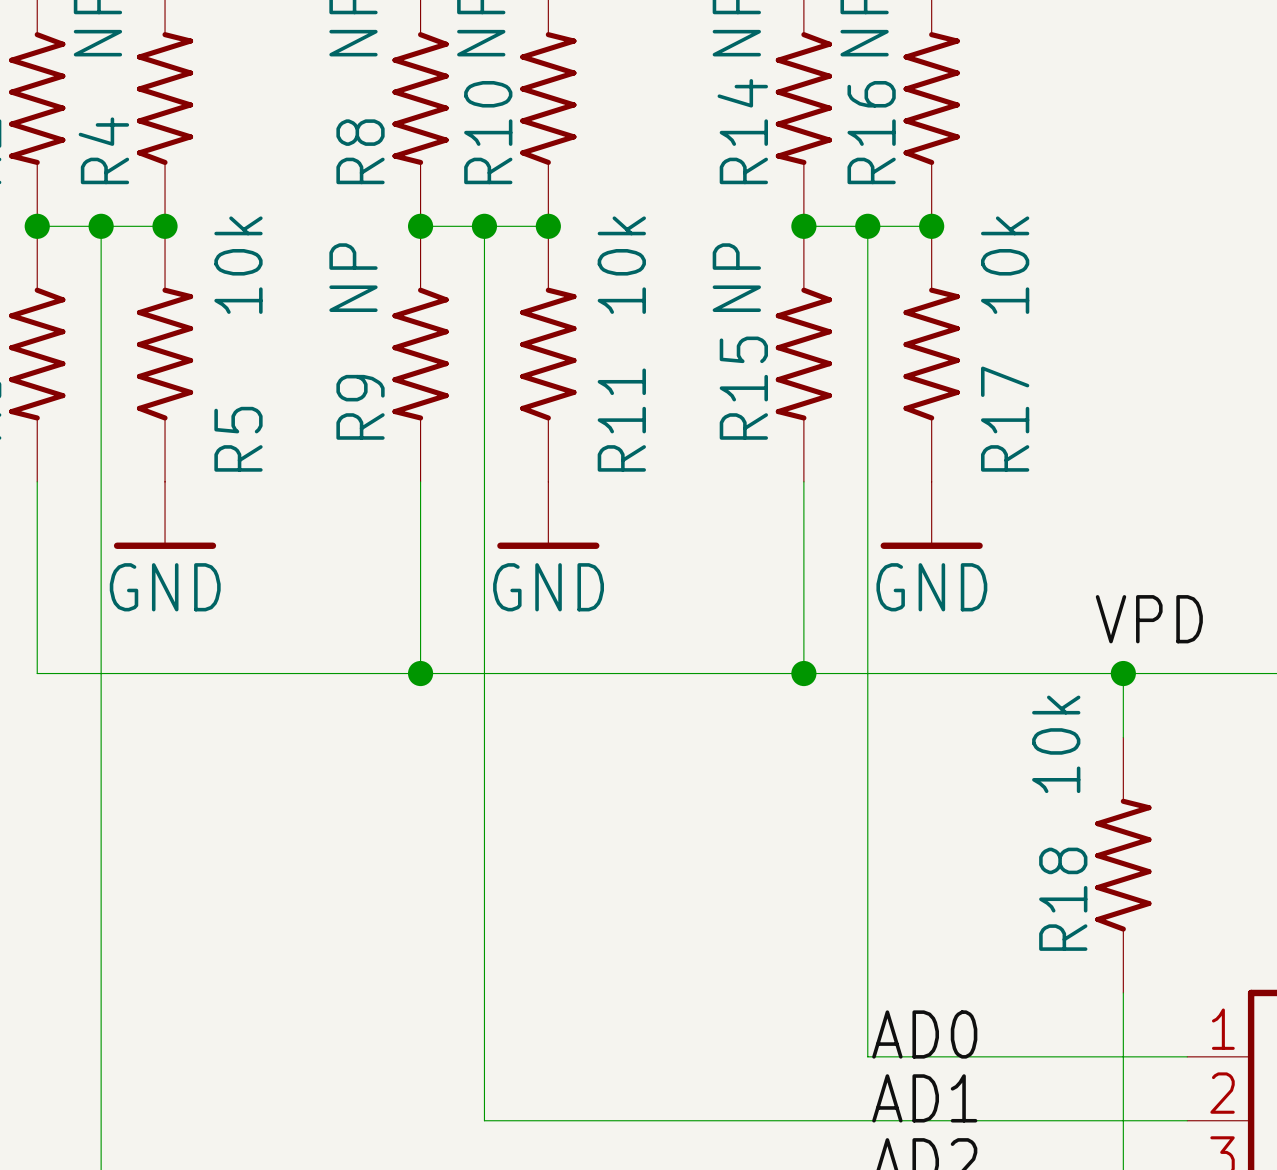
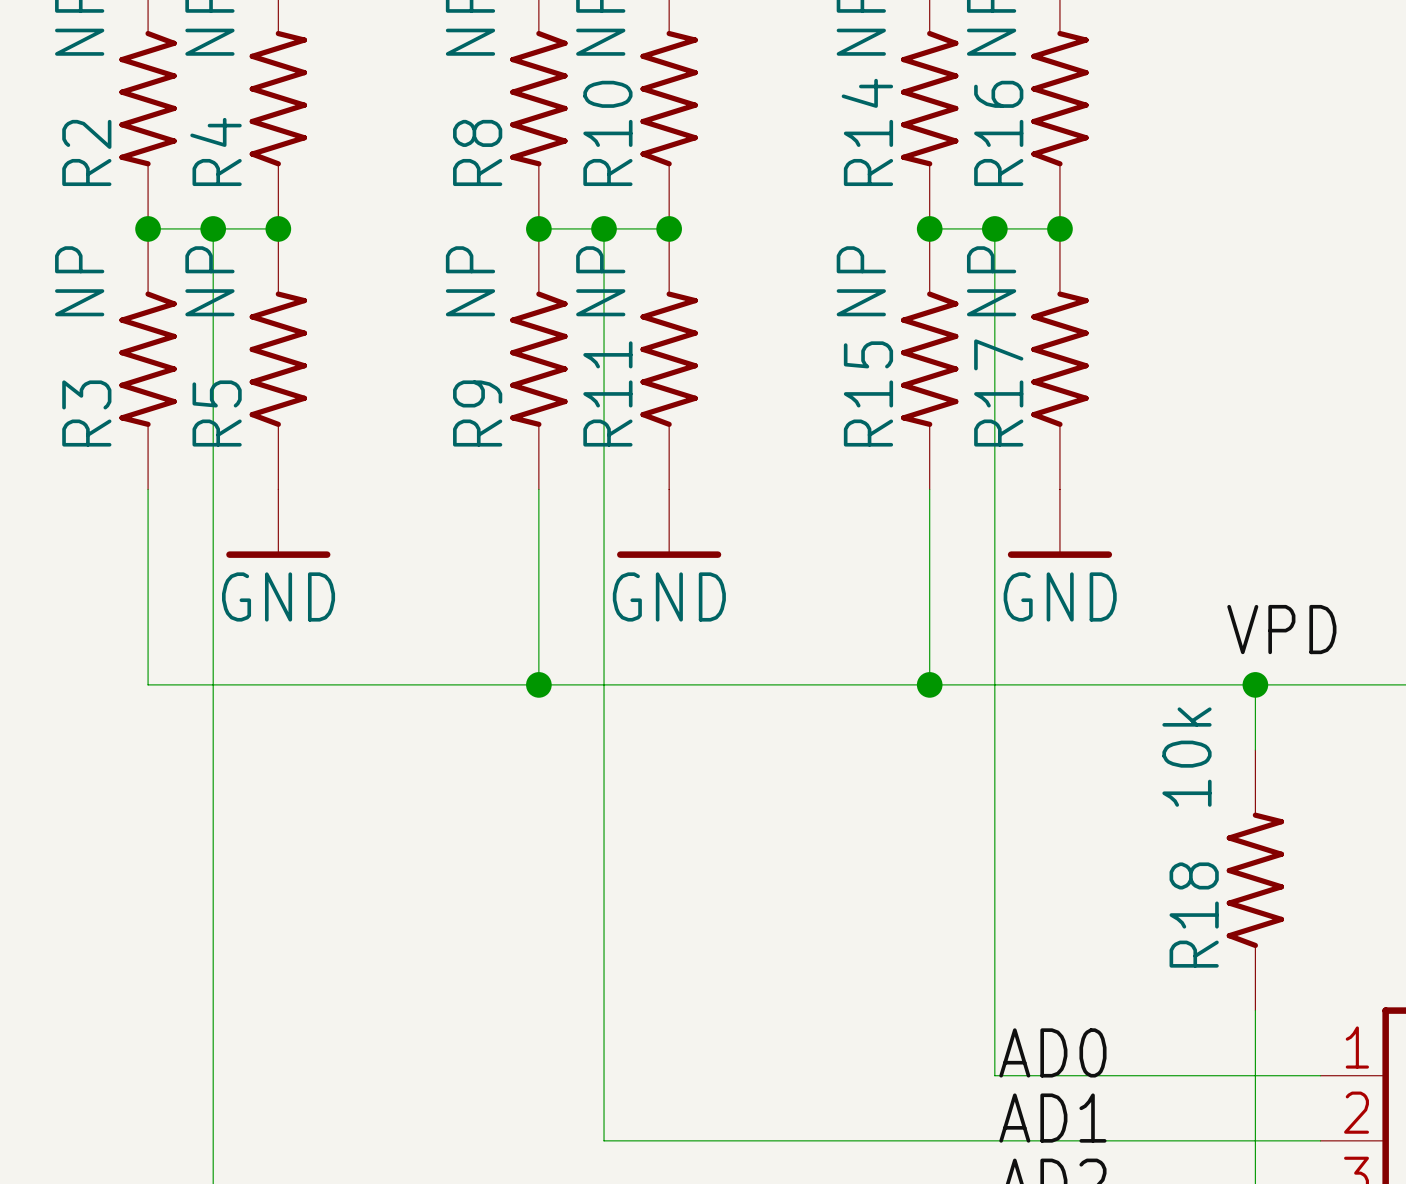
R5 value: 10k (238, 265) -> NP (209, 281)
R11 value: 10k (621, 265) -> NP (600, 281)
R17 value: 10k (1005, 265) -> NP (991, 281)
R17 name position: R17 (1005, 419) -> R17 (998, 392)
R11 name position: R11 (621, 420) -> R11 (607, 393)
R5 name position: R5 (238, 439) -> R5 (217, 413)

